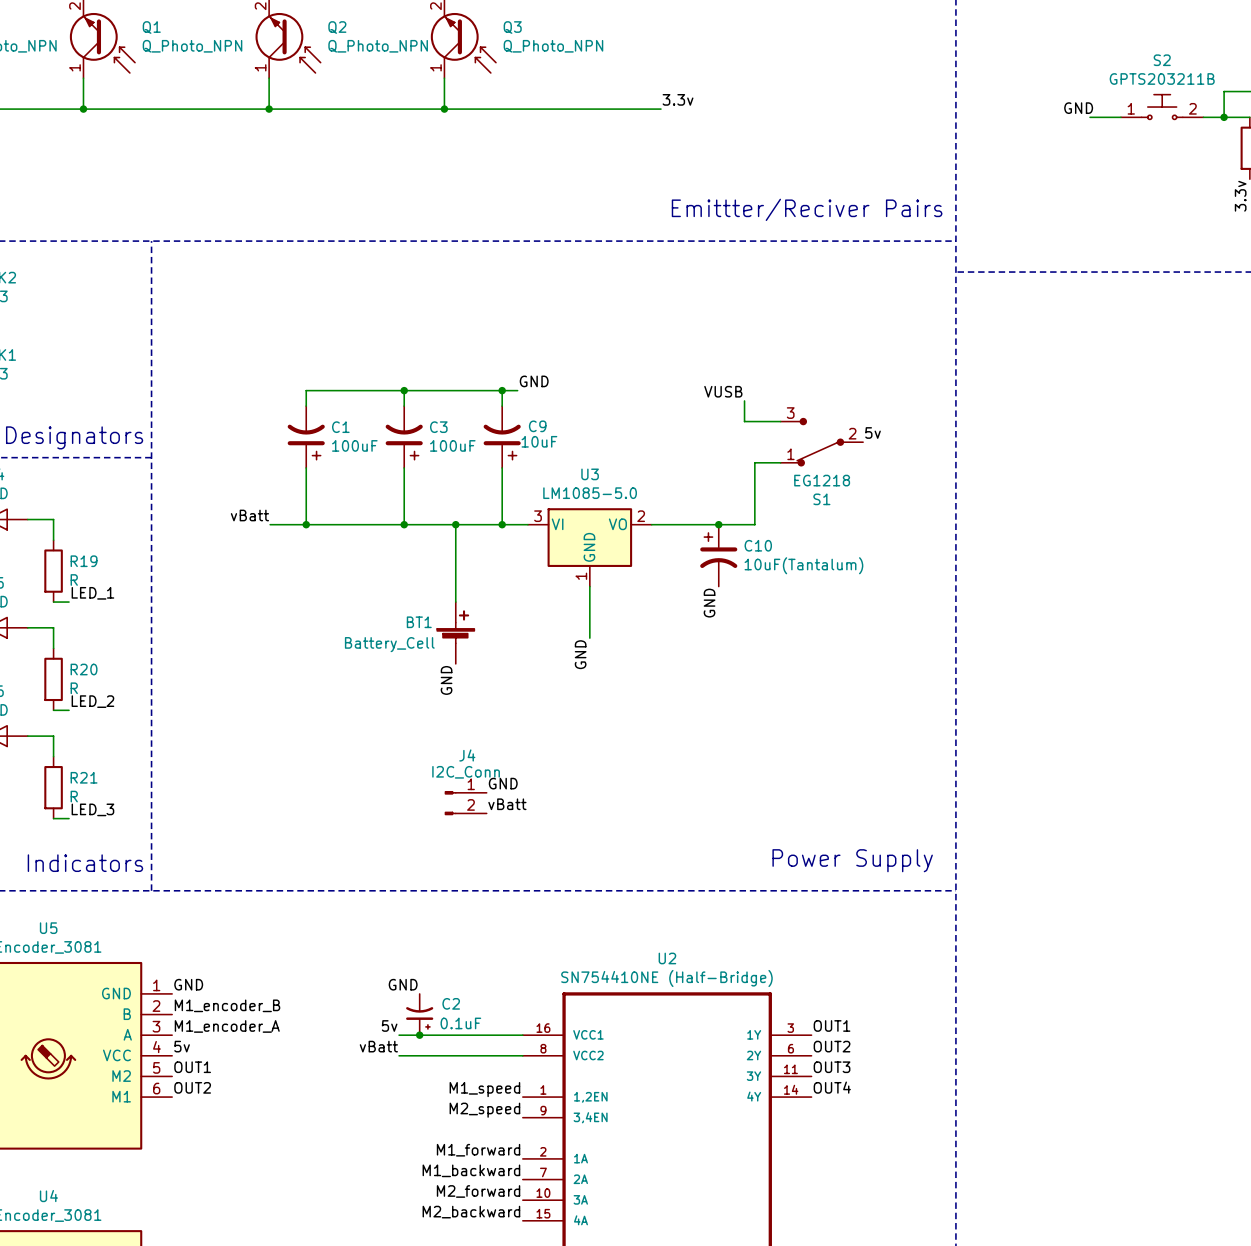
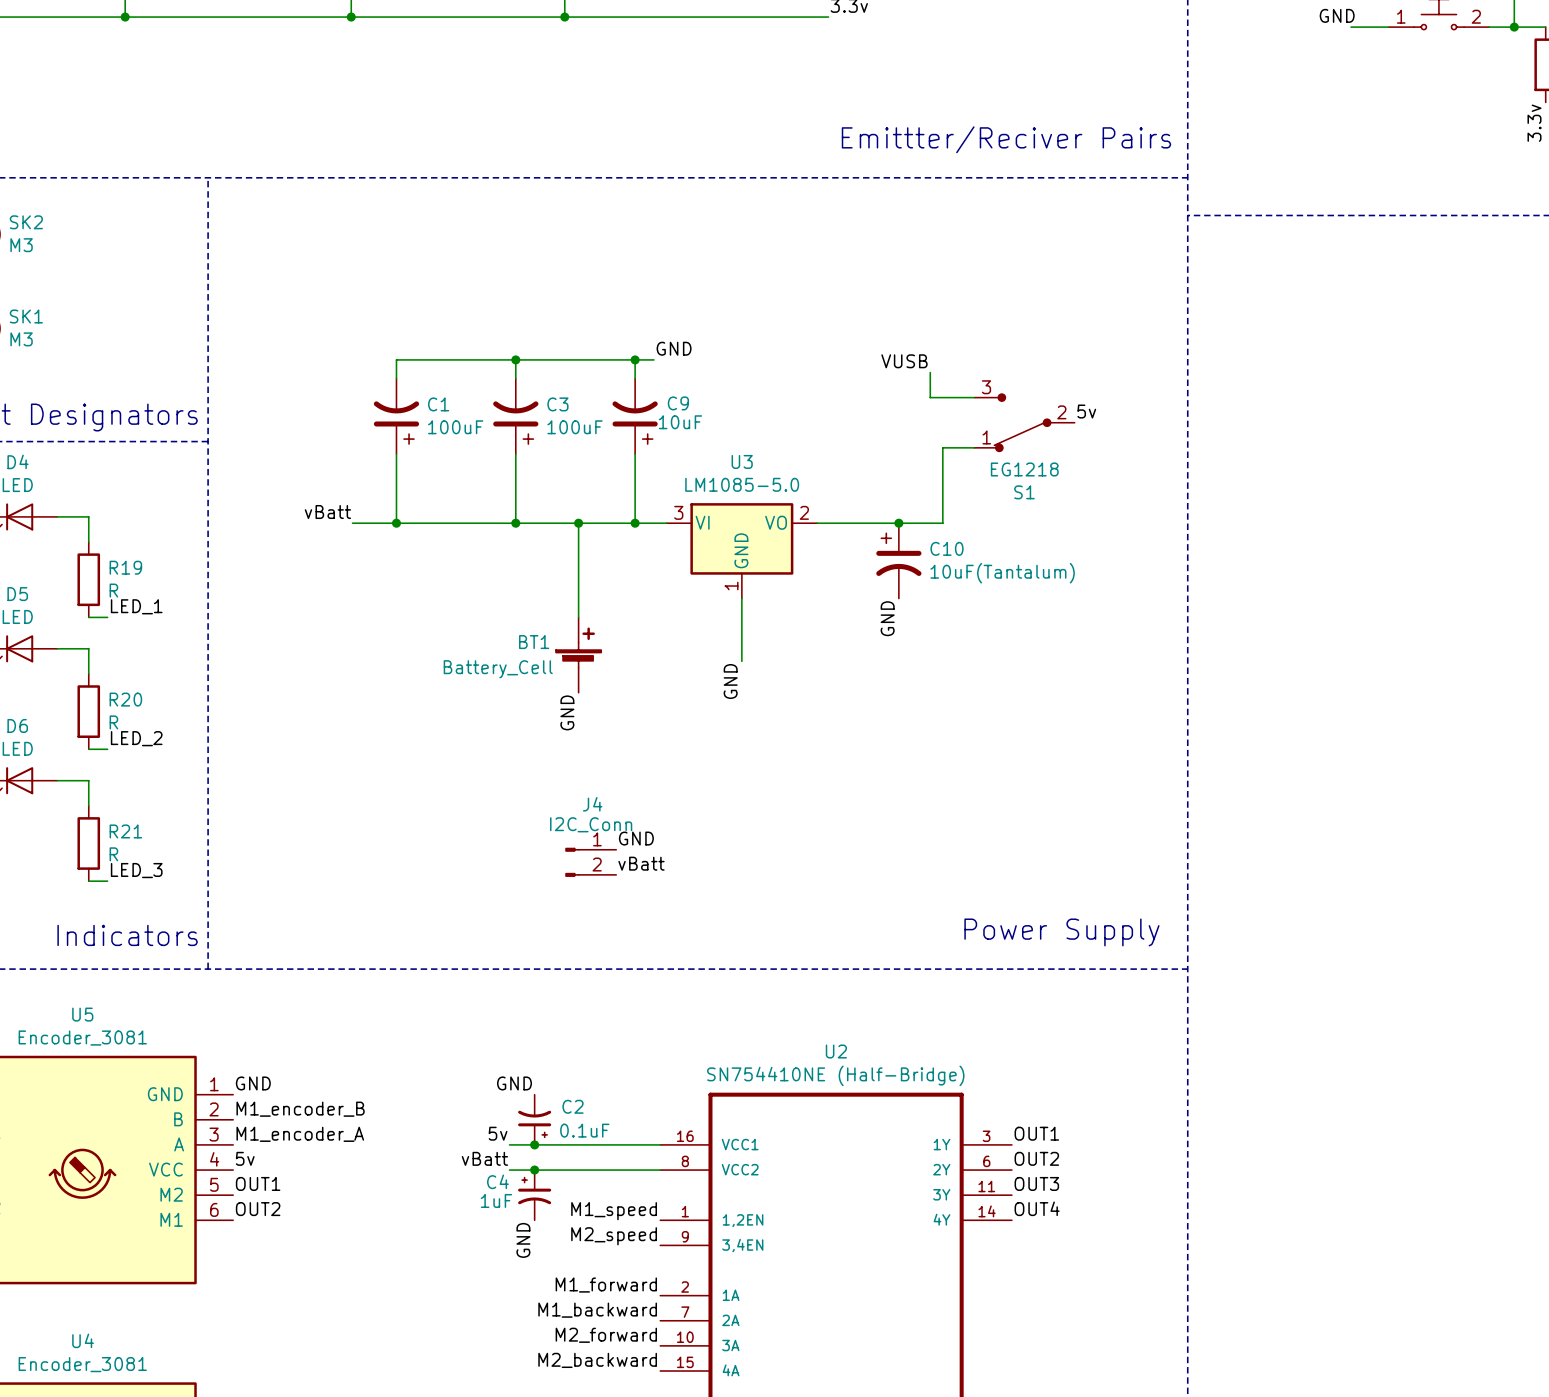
junction: none -> (534, 1170)
C4: none -> 1uF (534, 1195)
label: none -> GND (523, 1240)

